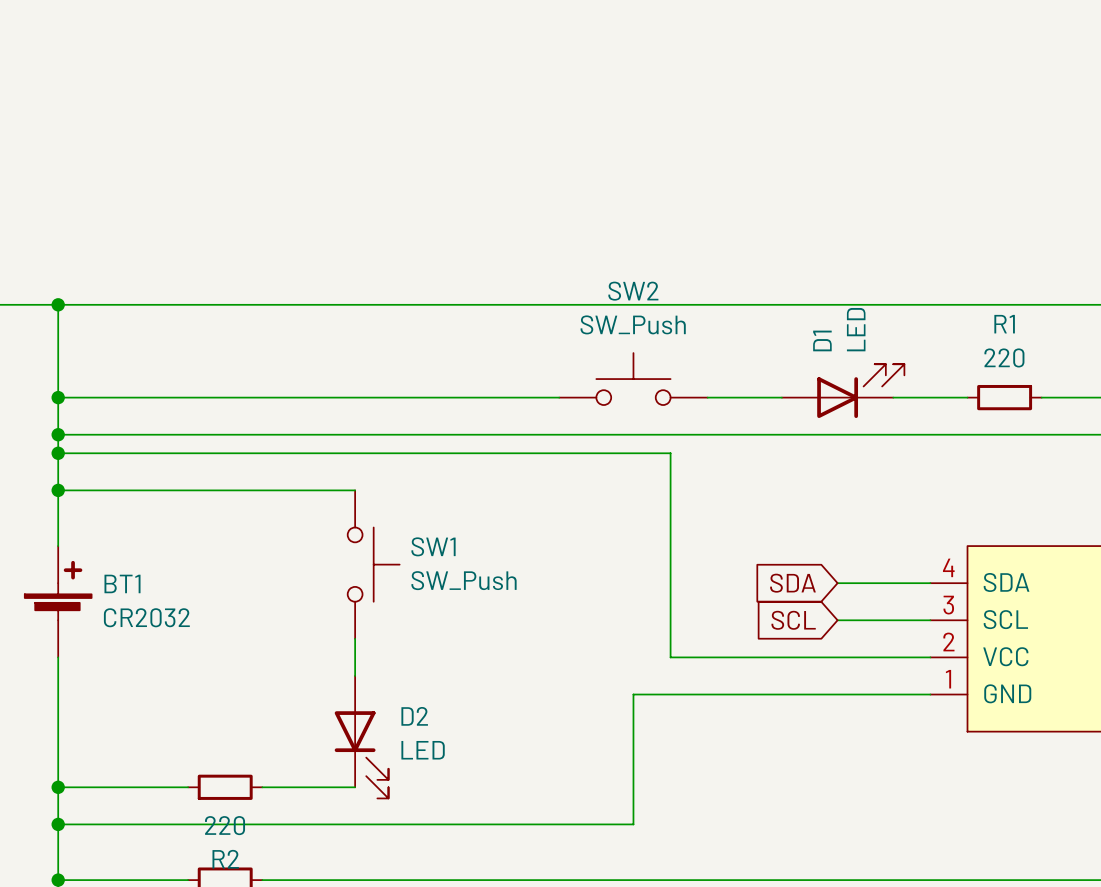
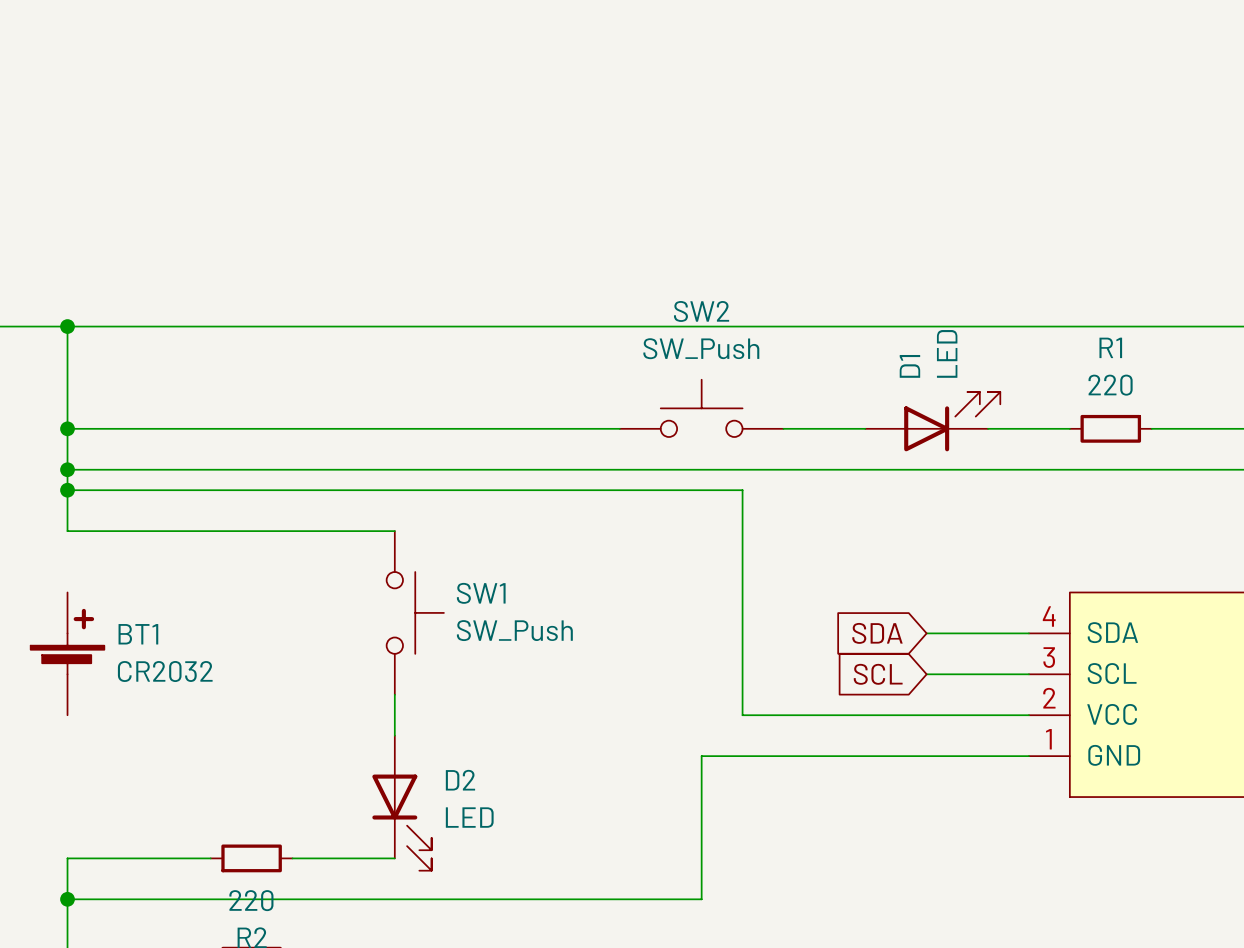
wire: (58, 490) (58, 546) -> none
junction: (58, 490) -> none
wire: (58, 657) (58, 787) -> none
junction: (58, 787) -> none

